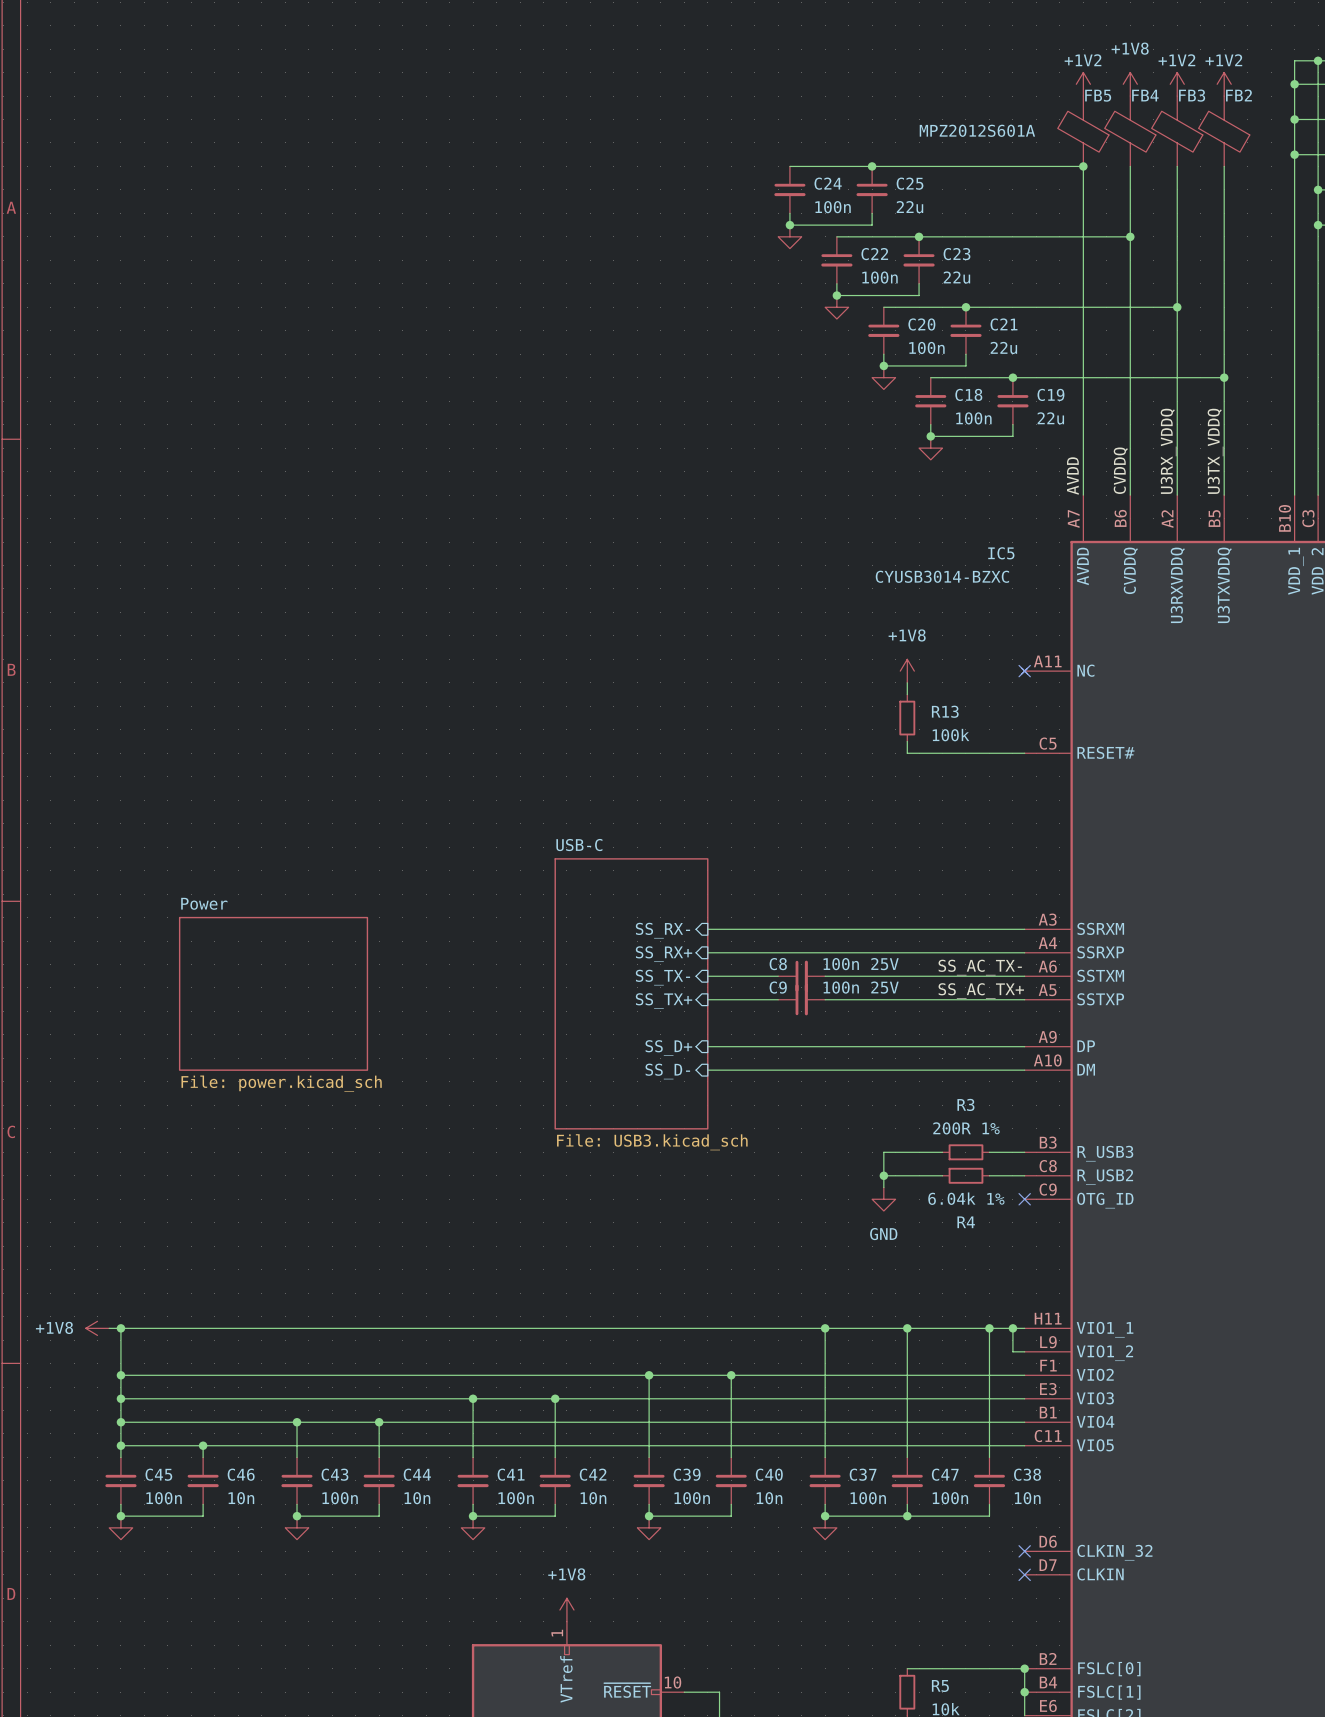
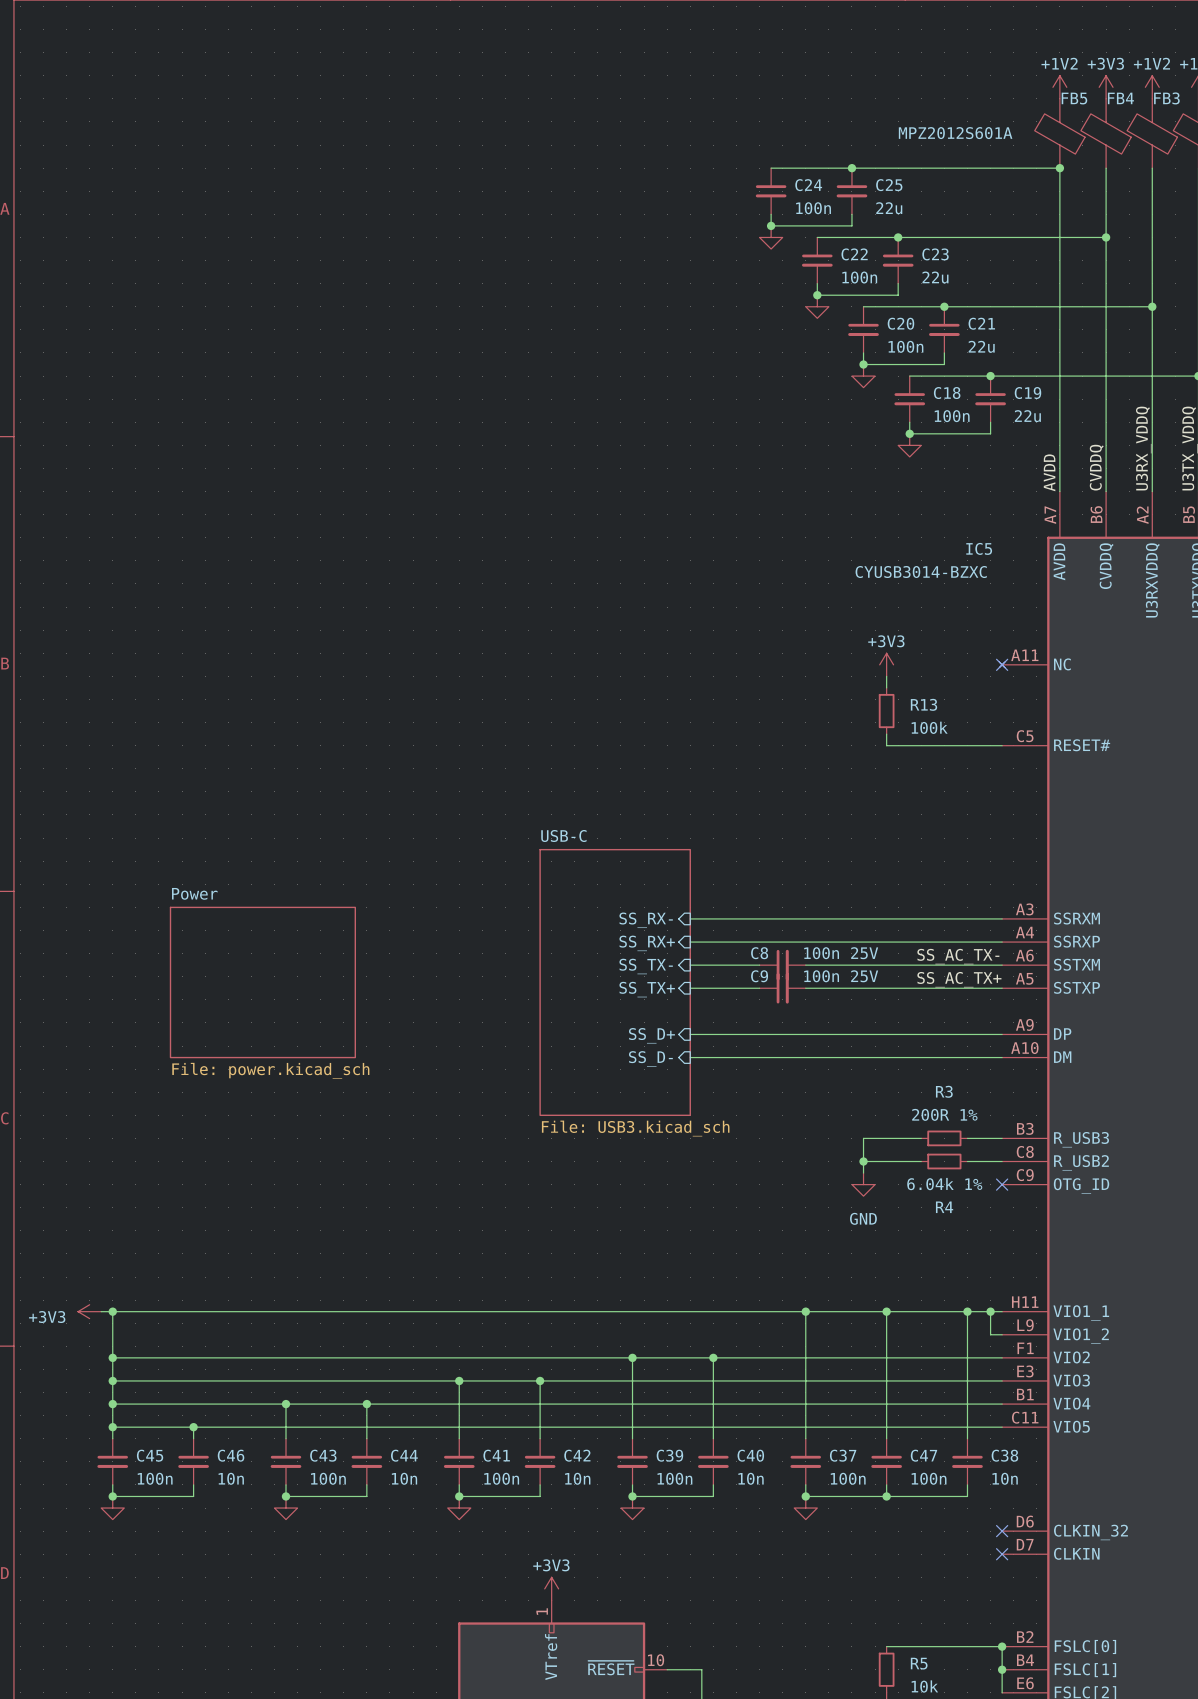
power symbol: +1V8 (1130, 84) -> +3V3 (1106, 87)
power symbol: +1V8 (907, 671) -> +3V3 (886, 664)
power symbol: +1V8 (97, 1328) -> +3V3 (89, 1311)
power symbol: +1V8 (566, 1610) -> +3V3 (551, 1588)

